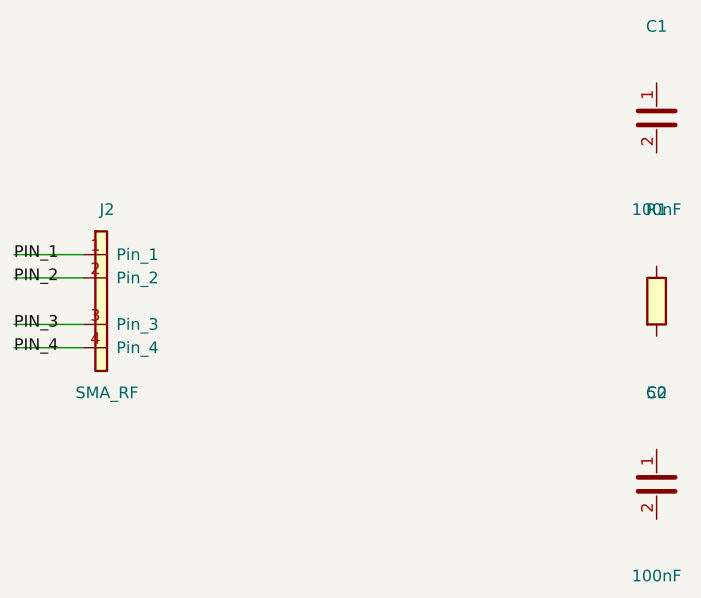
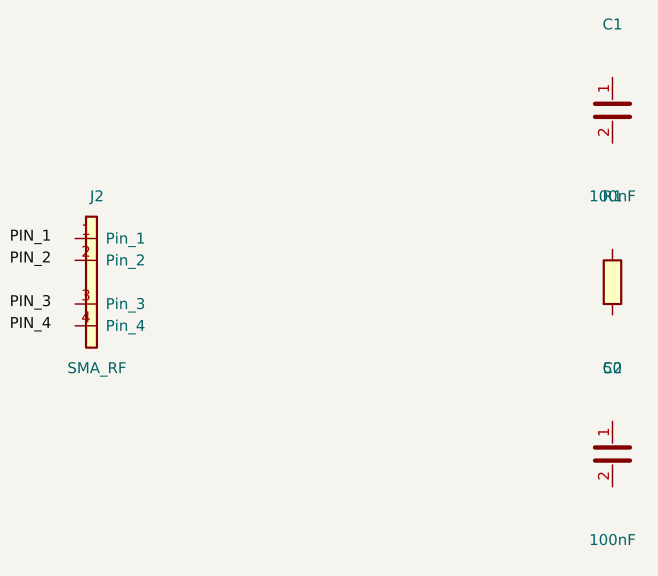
wire: (13, 254) (83, 254) -> none
wire: (13, 277) (83, 277) -> none
wire: (13, 324) (83, 324) -> none
wire: (13, 347) (83, 347) -> none

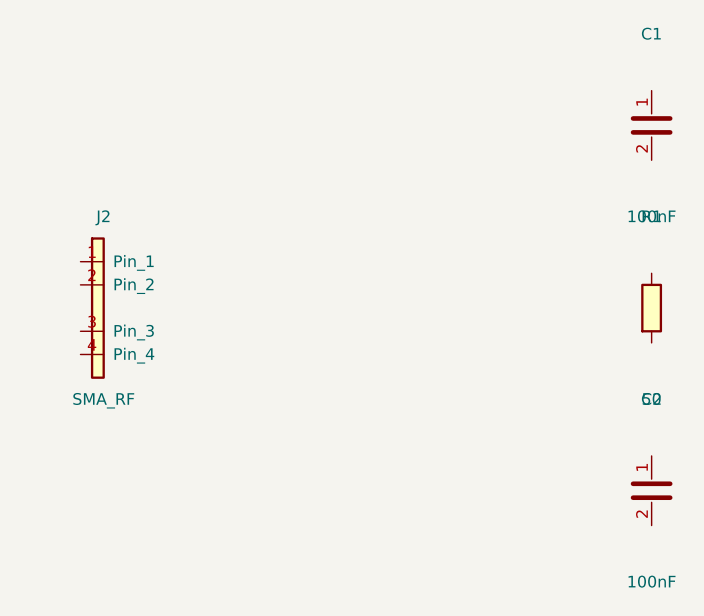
label: PIN_1 (30, 236) -> none
label: PIN_2 (30, 258) -> none
label: PIN_3 (30, 302) -> none
label: PIN_4 (30, 324) -> none

